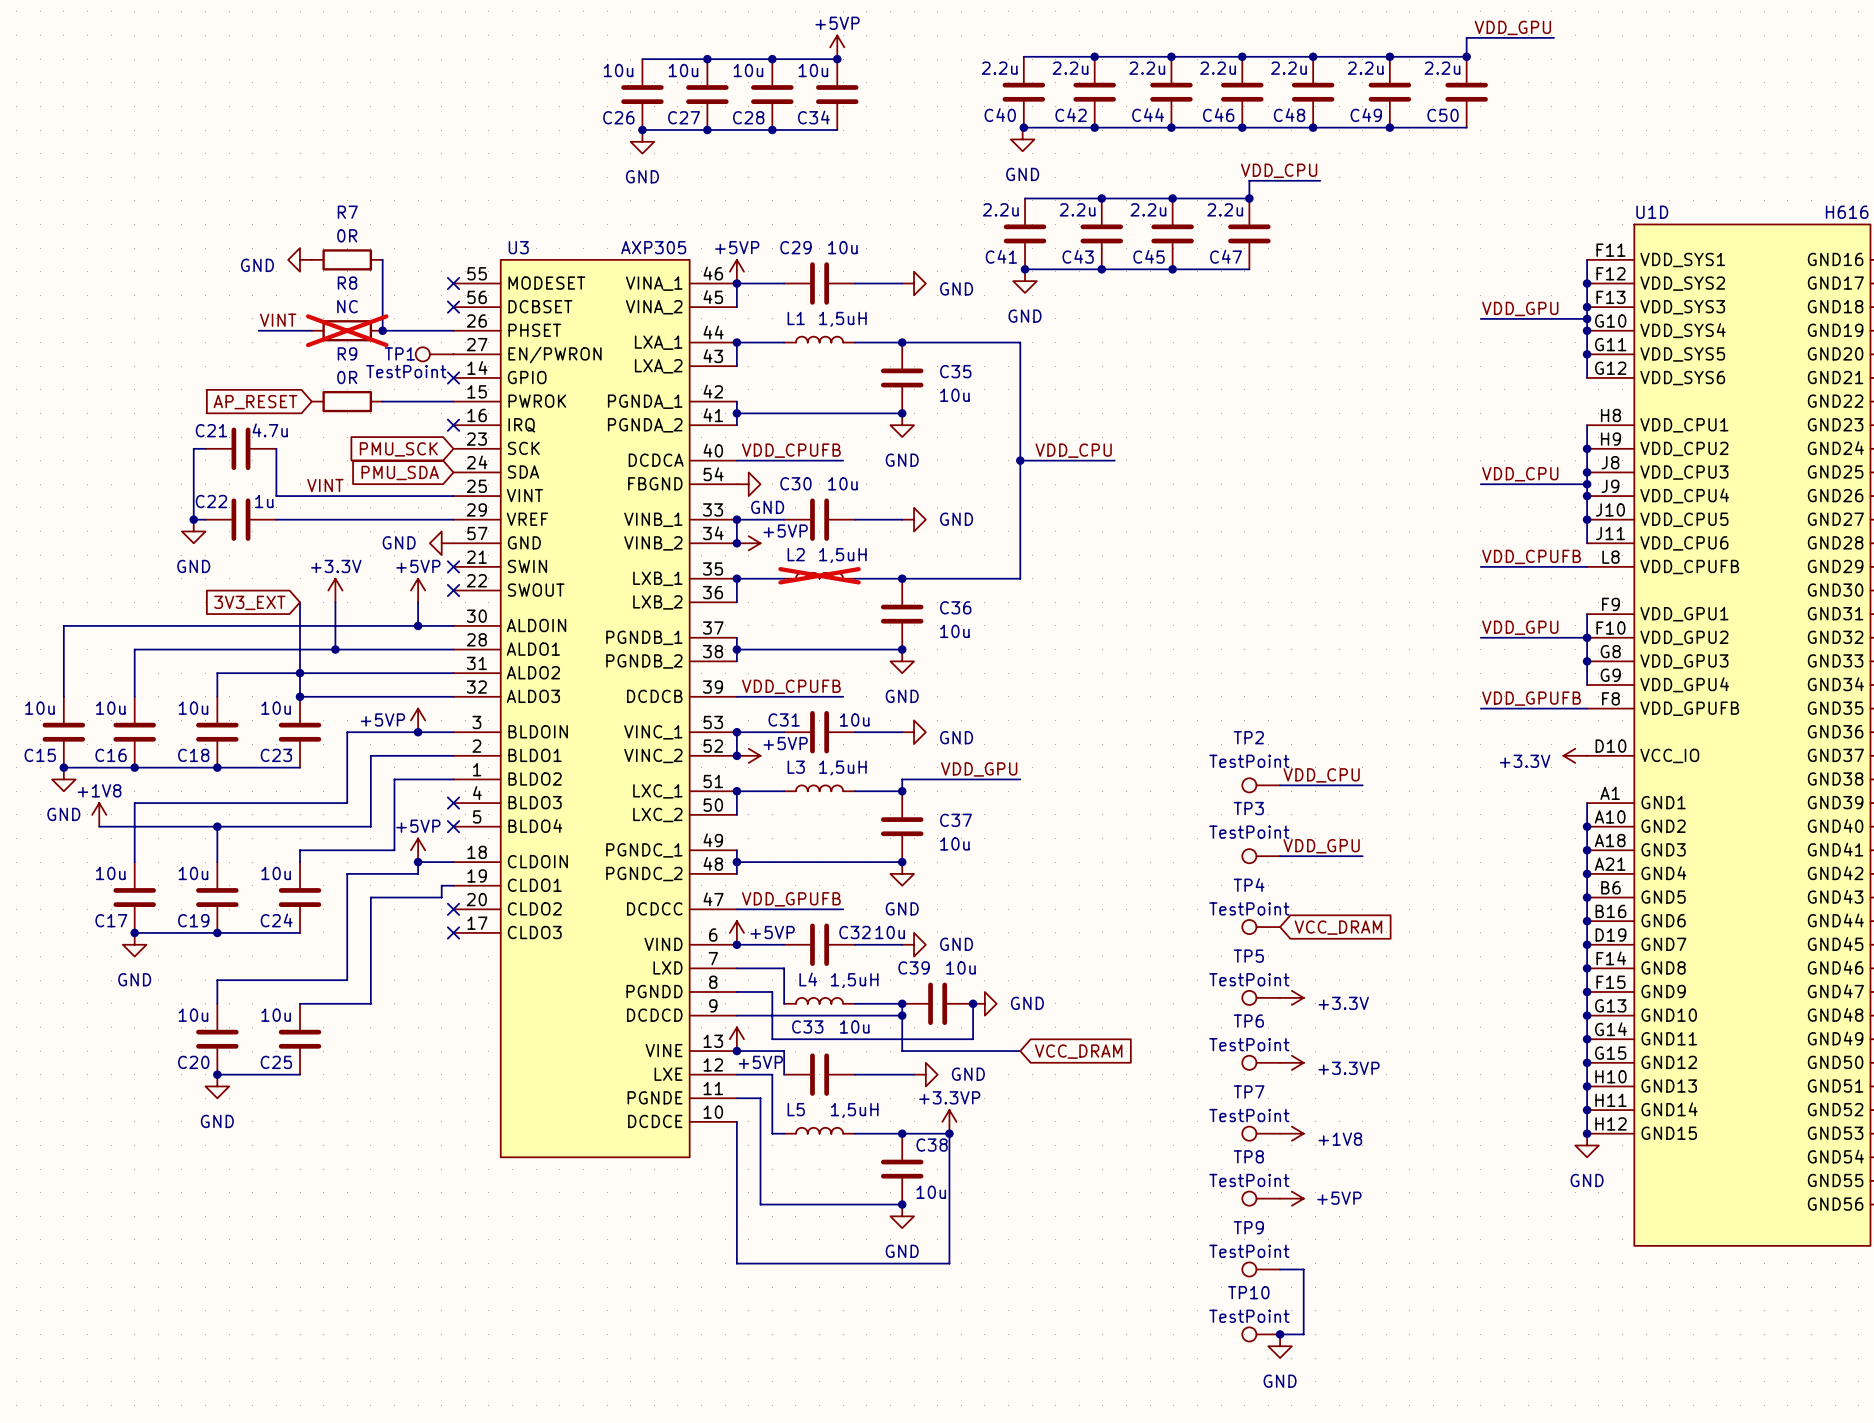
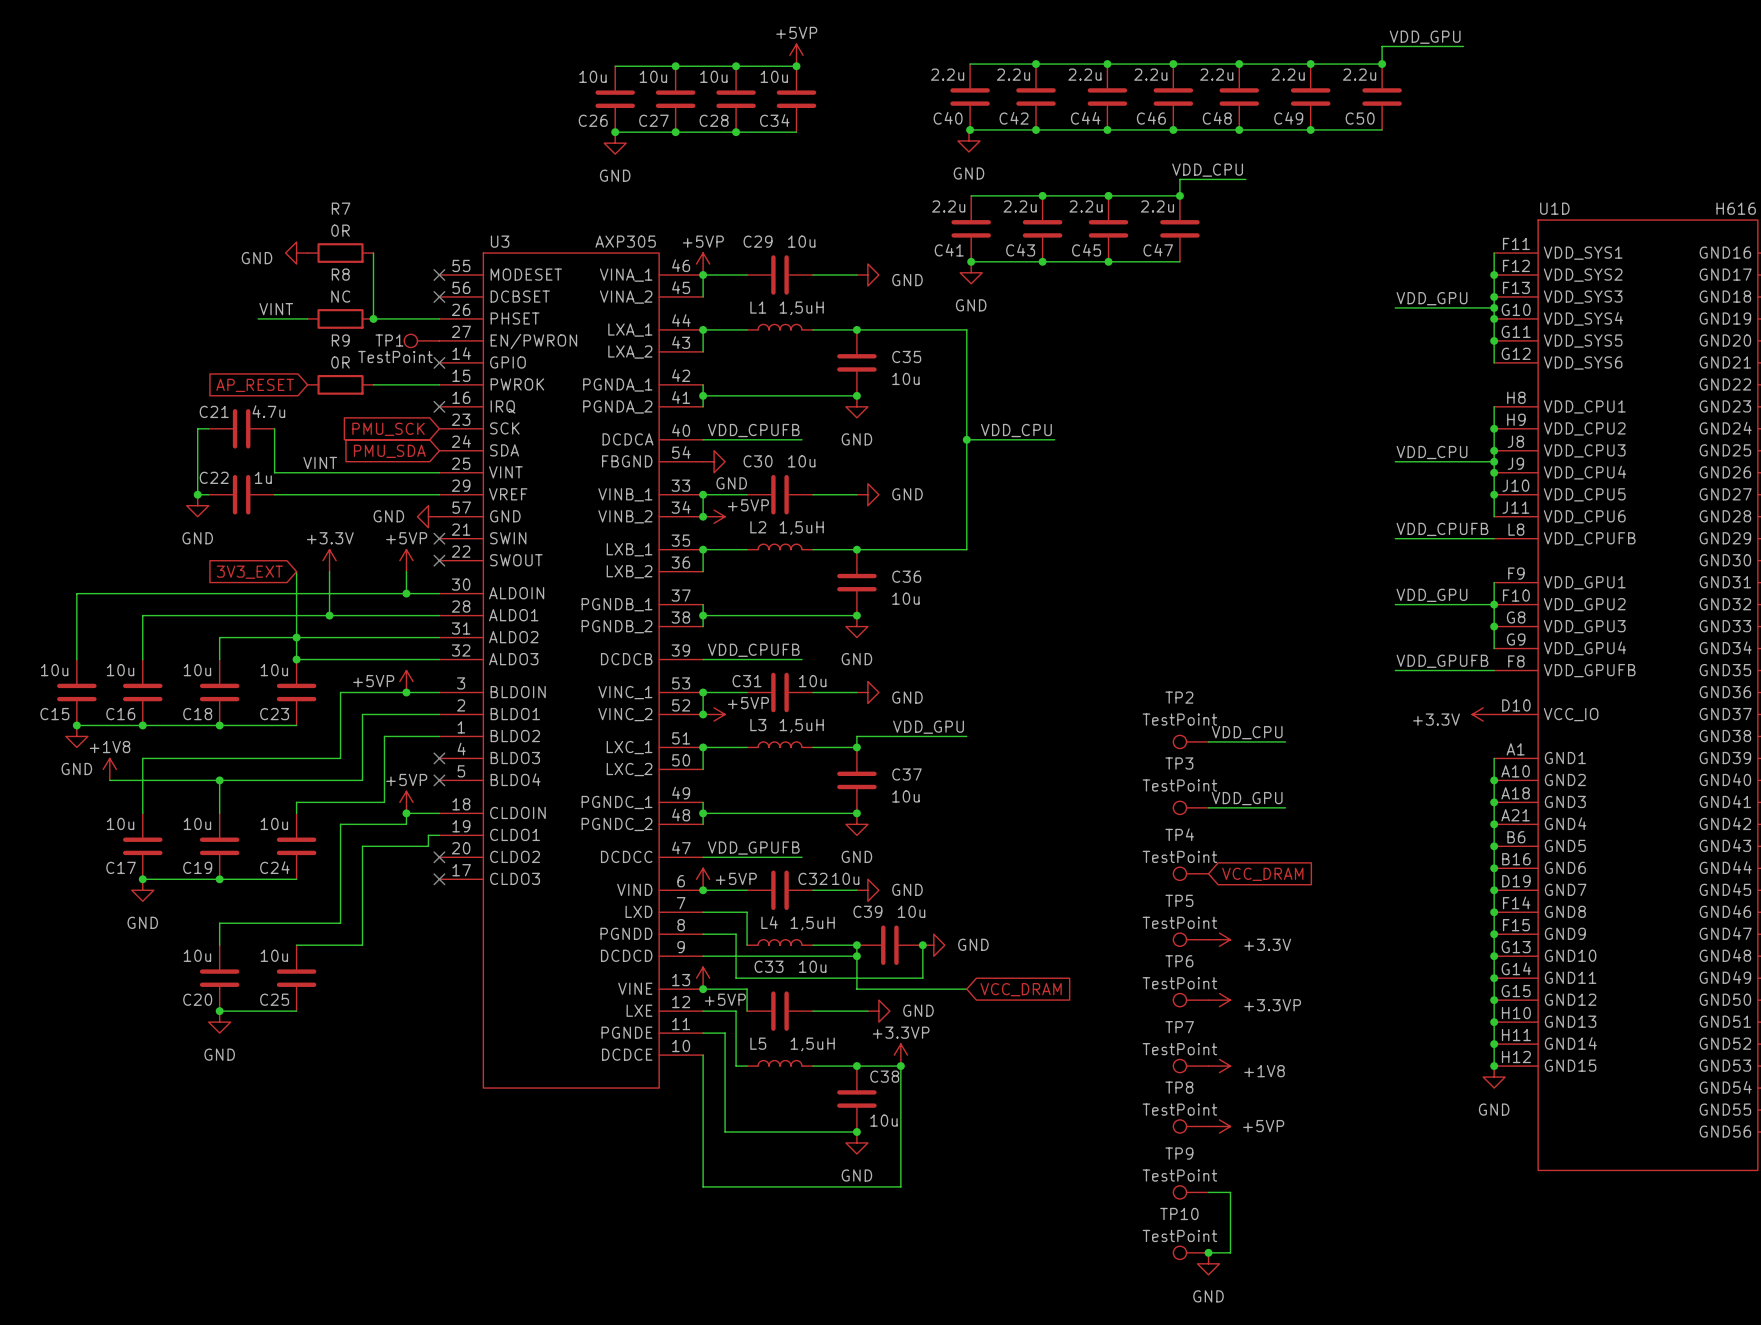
R8 do-not-place cross: (347, 330) -> none
L2 do-not-place cross: (819, 575) -> none

